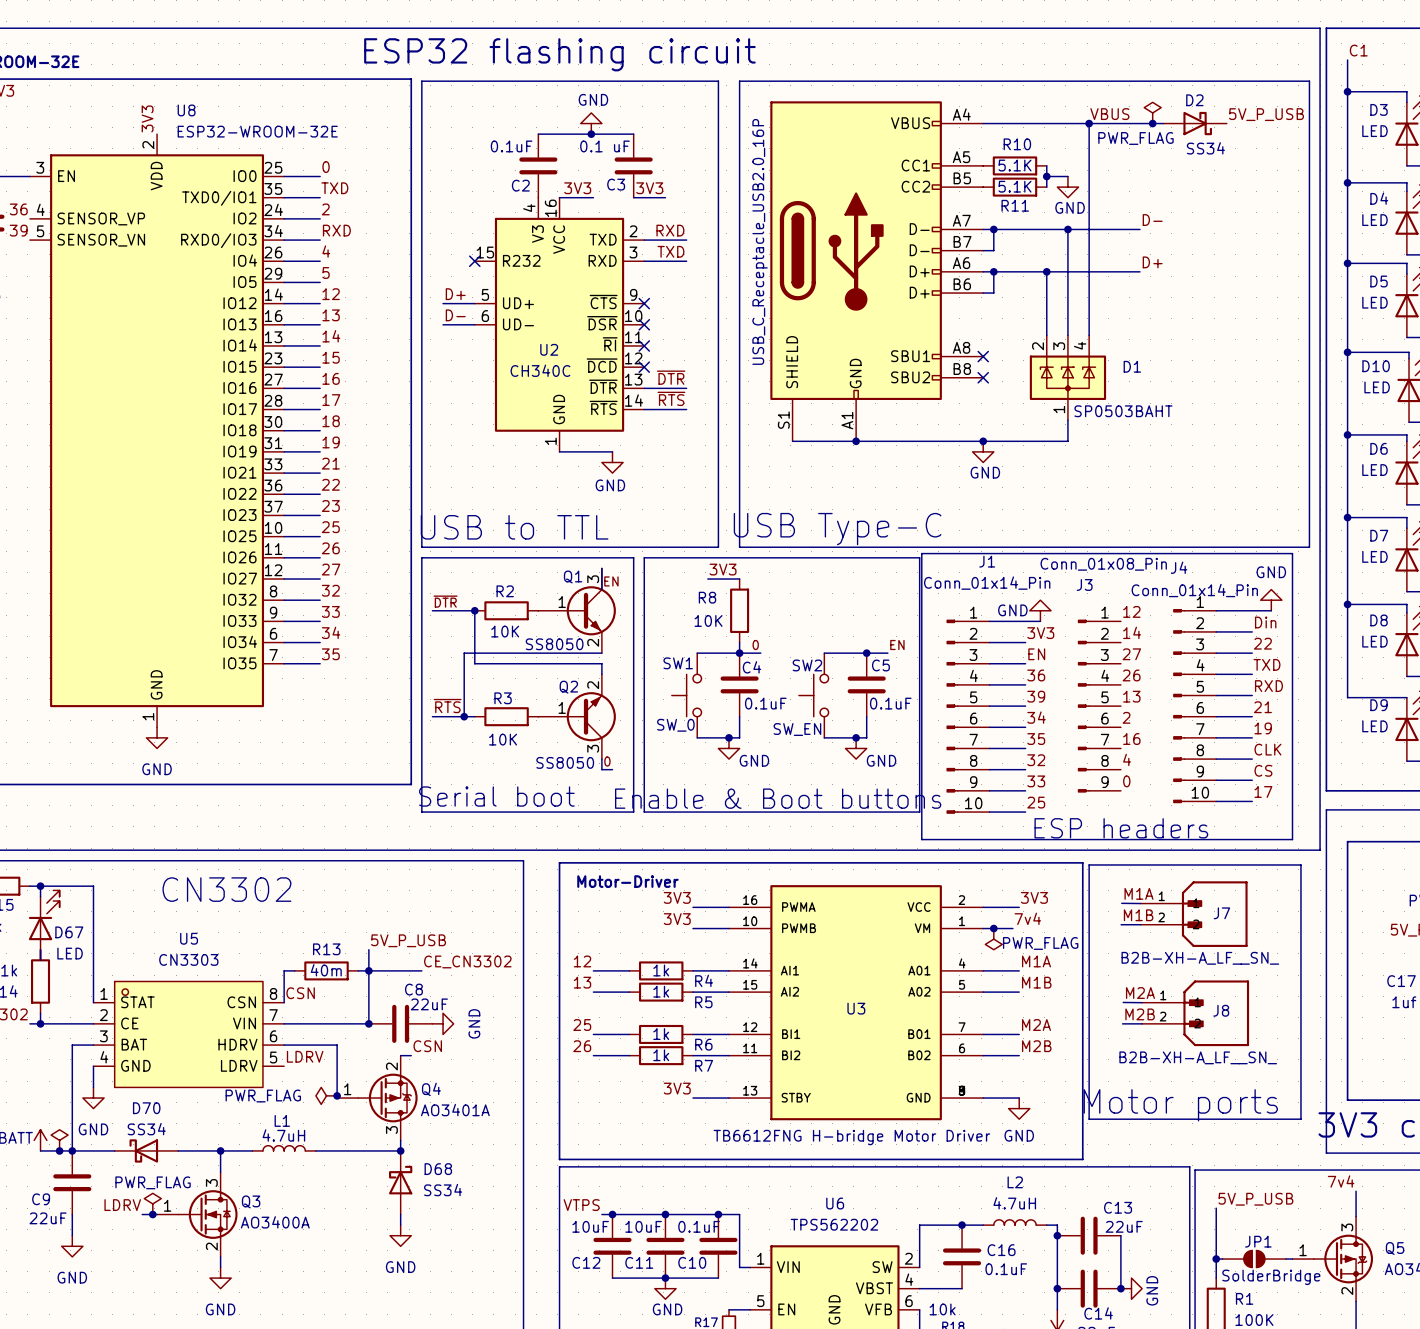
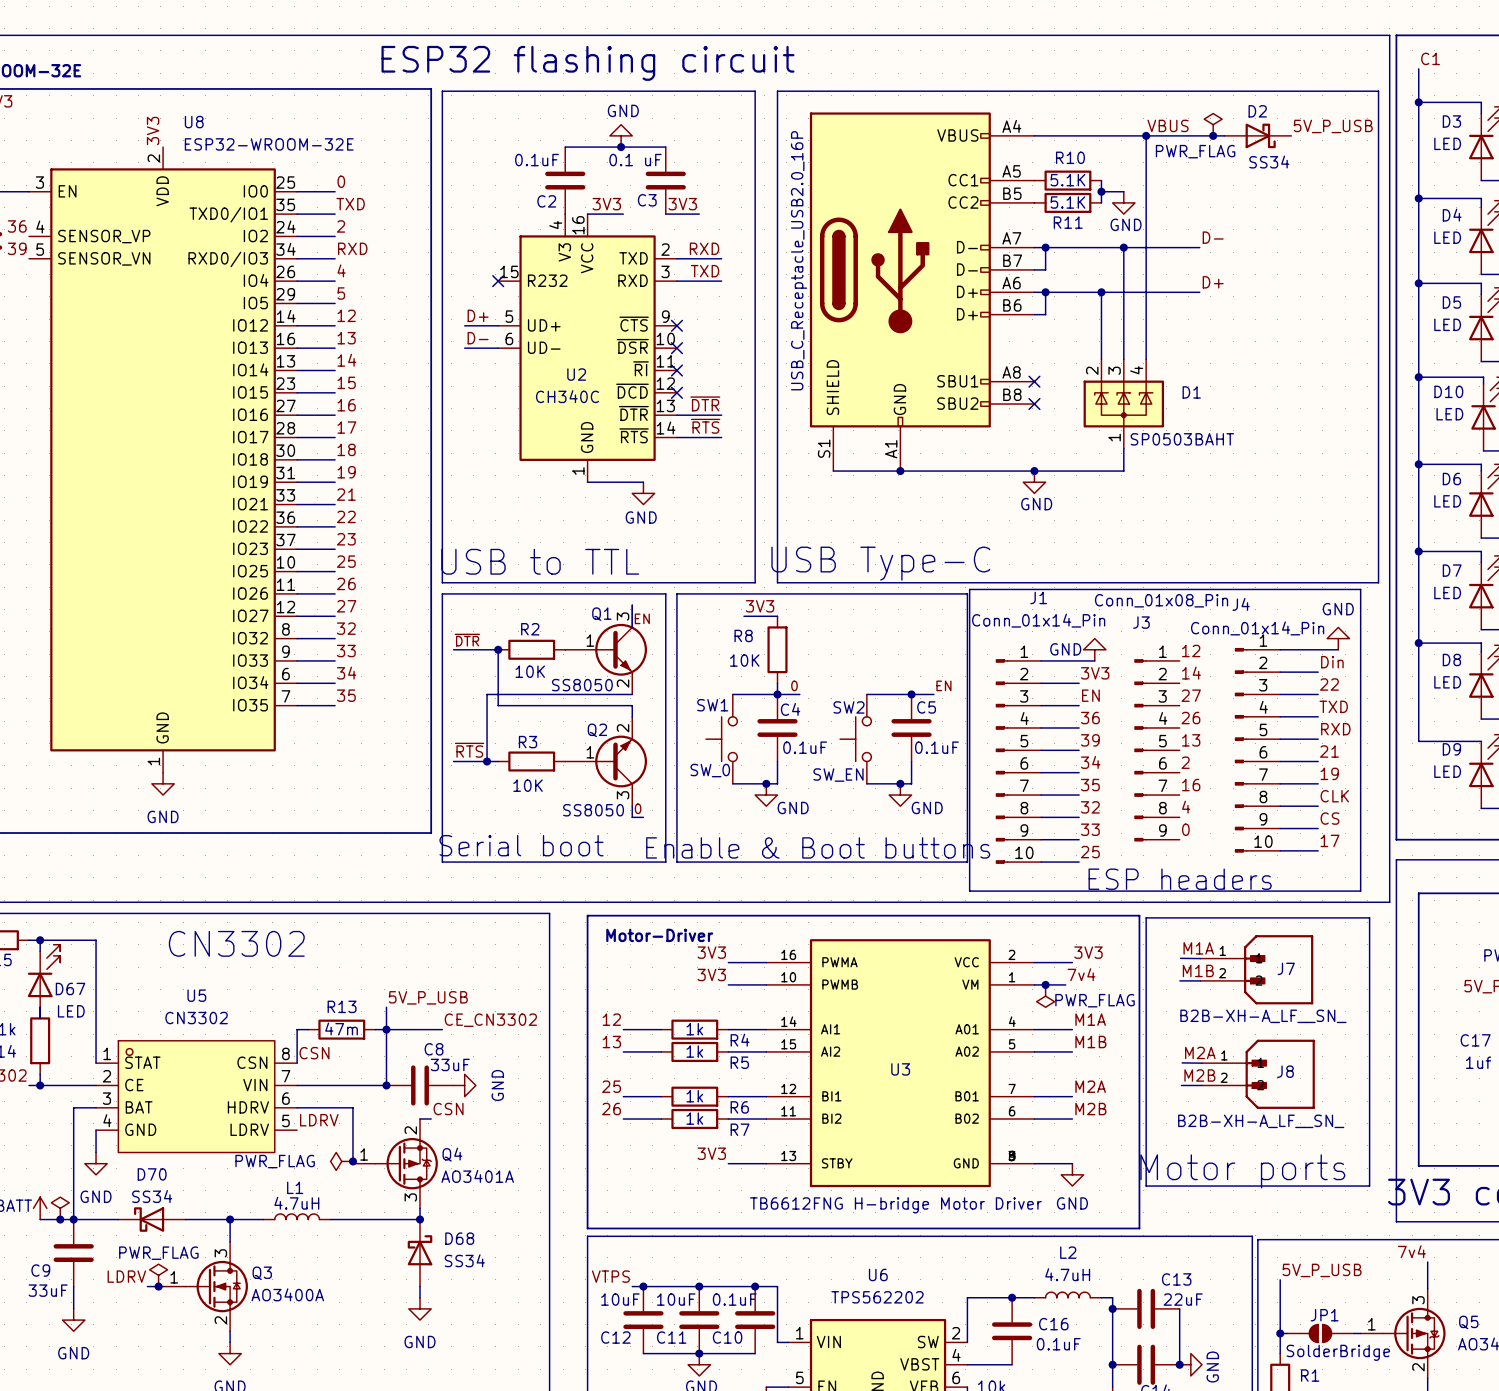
U5 value: CN3303 (188, 959) -> CN3302 (196, 1018)
R13 value: 40m (326, 970) -> 47m (341, 1028)
C8 value: 22uF (429, 1004) -> 33uF (450, 1064)
C9 value: 22uF (48, 1218) -> 33uF (48, 1290)

